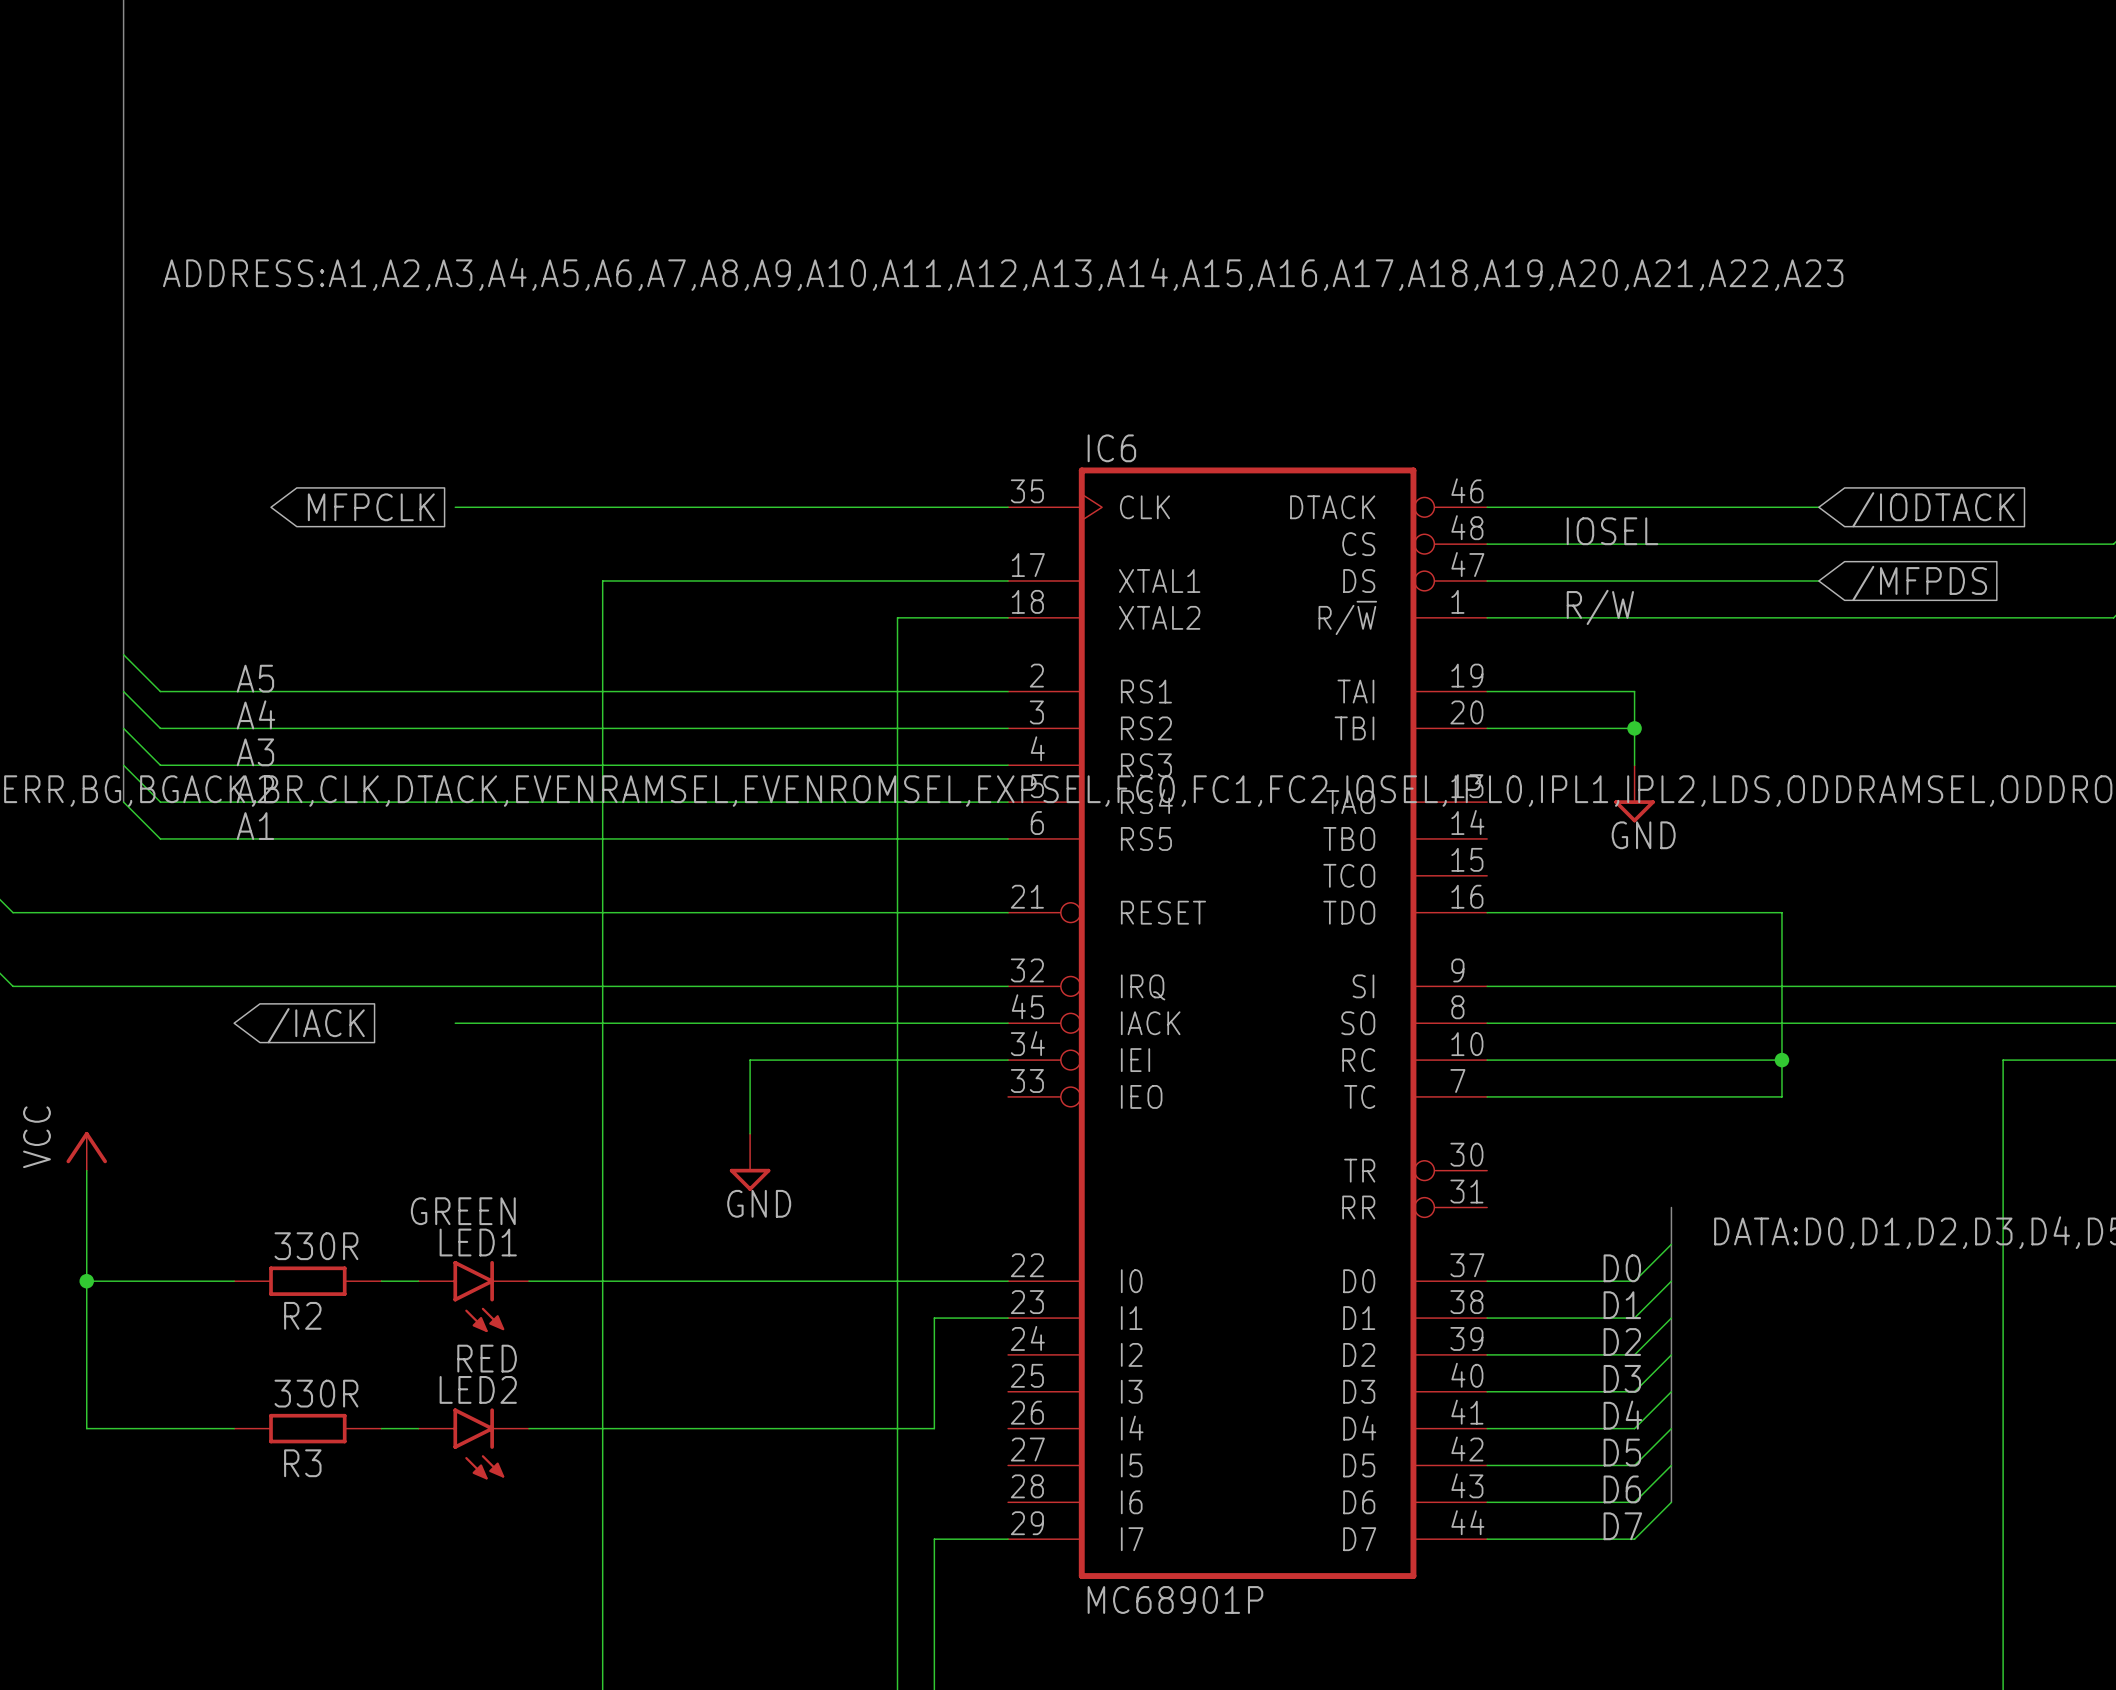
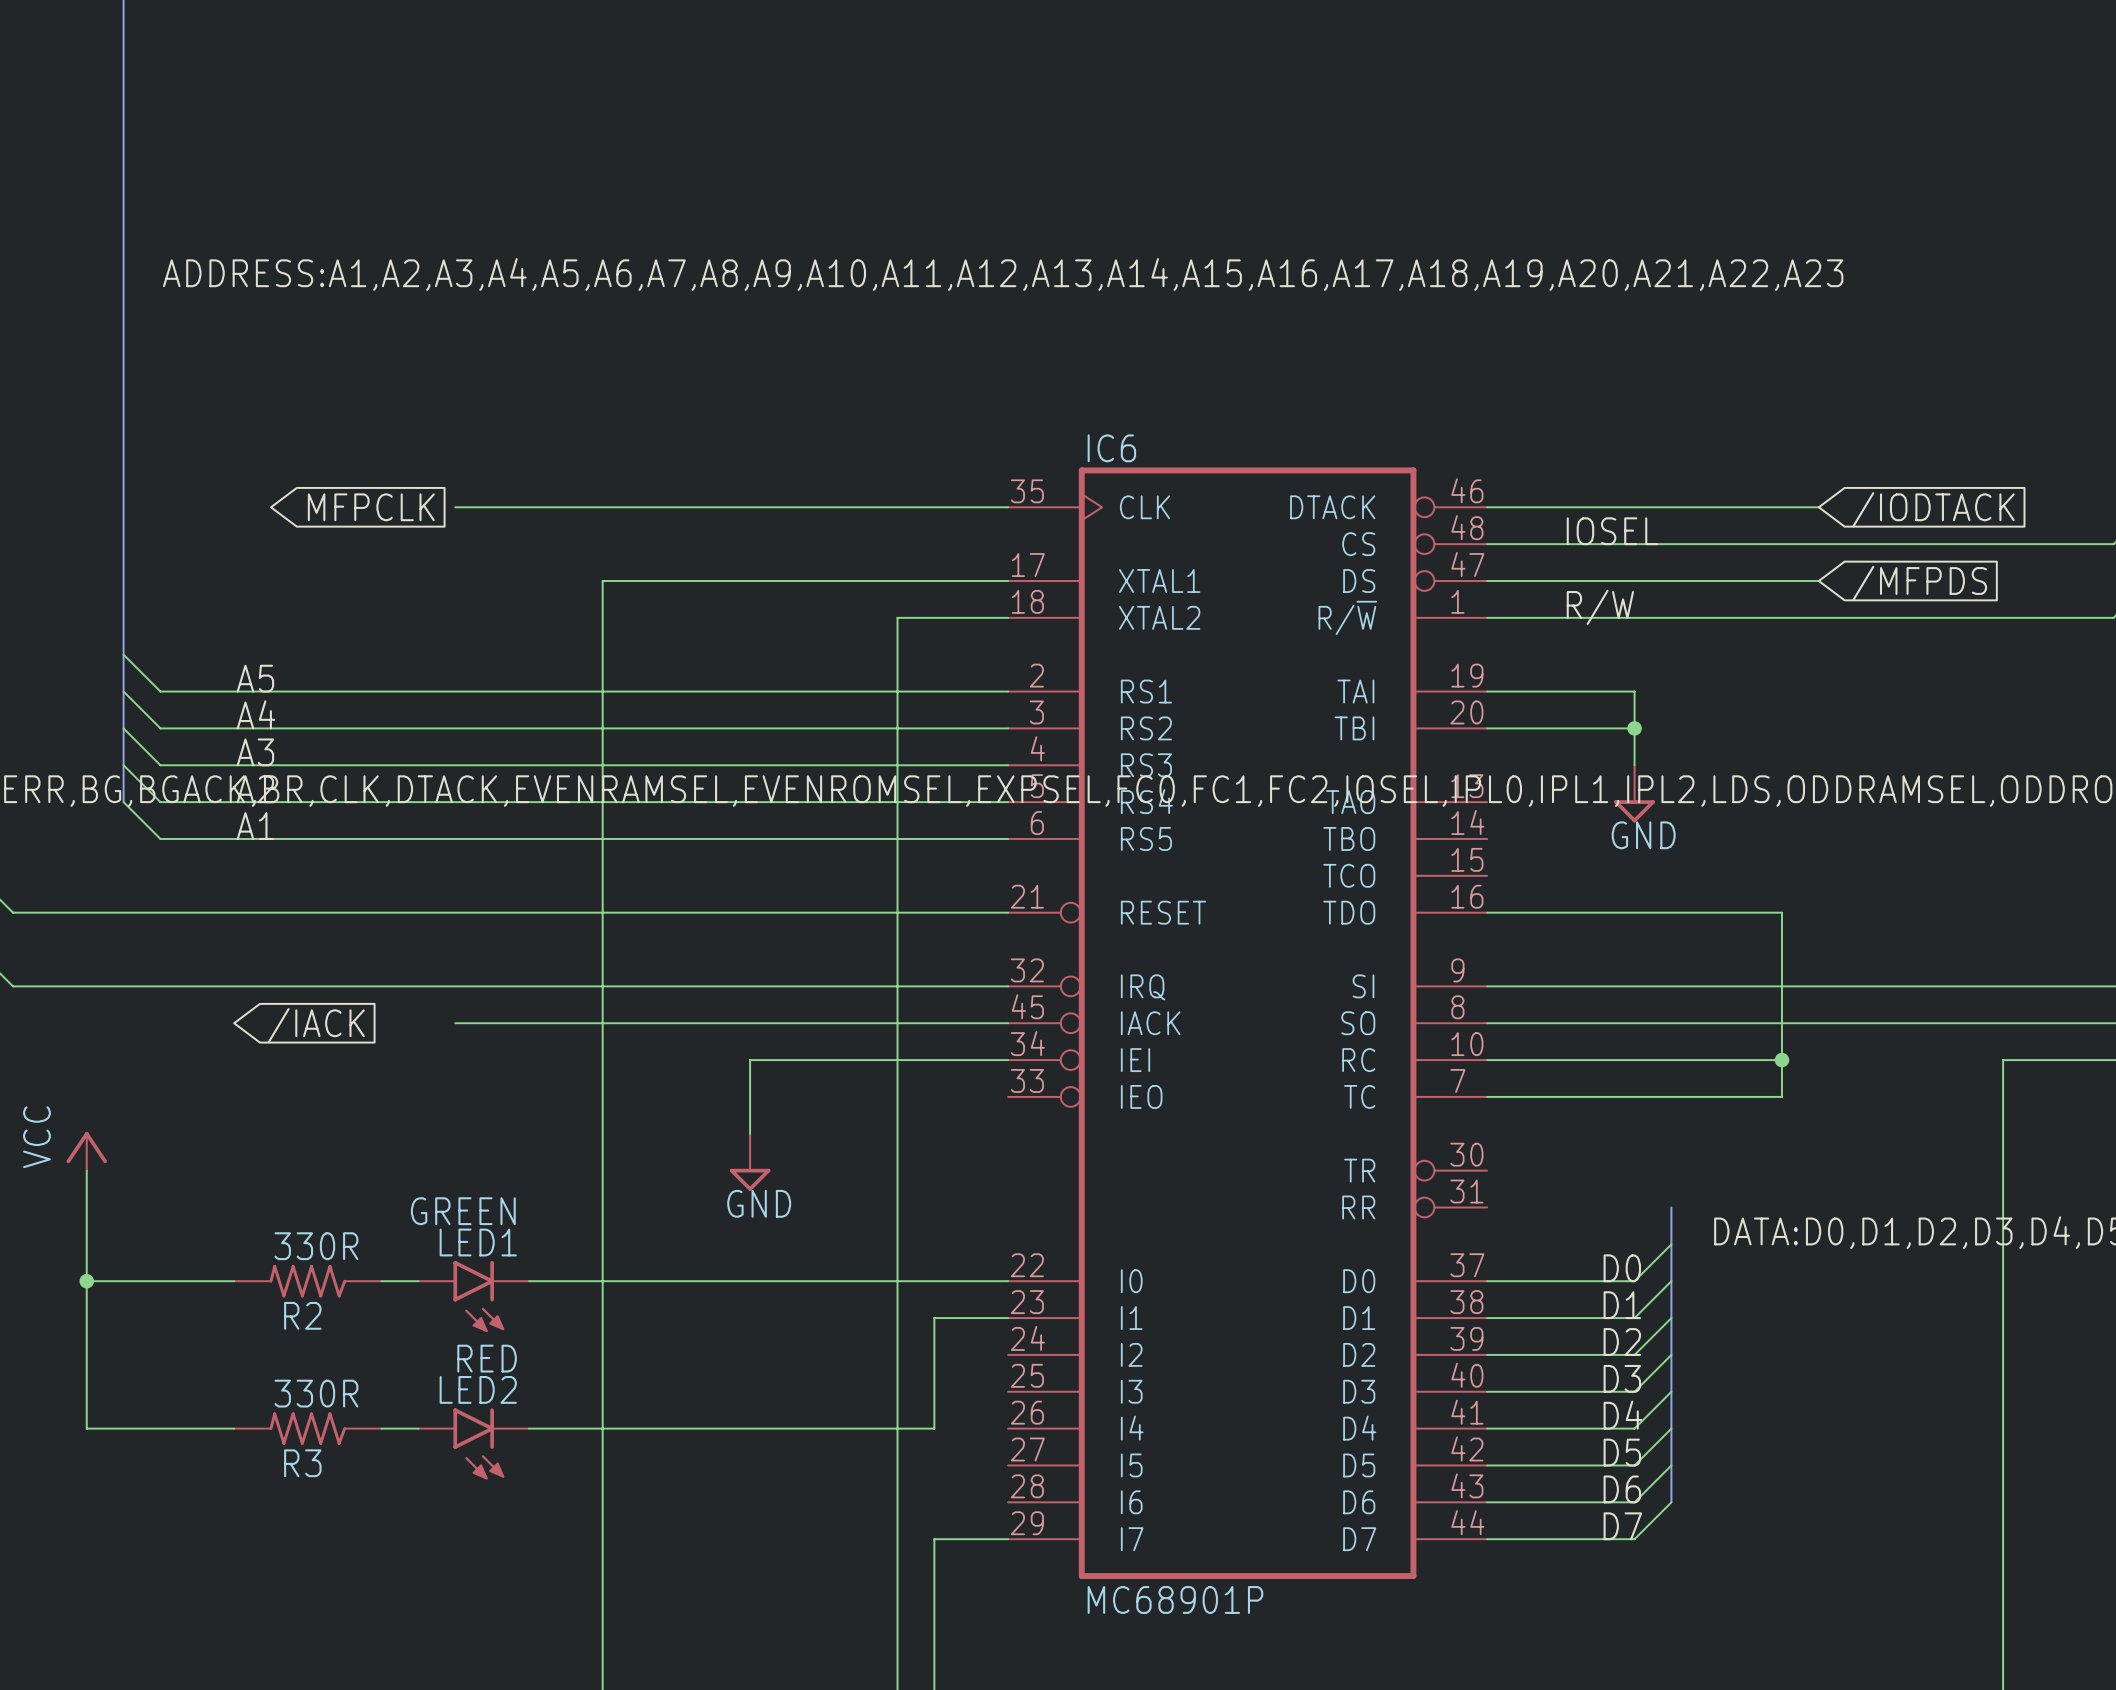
R2 symbol: [234, 1266, 382, 1296] -> [234, 1264, 382, 1298]
R3 symbol: [234, 1413, 382, 1444] -> [234, 1412, 382, 1445]

